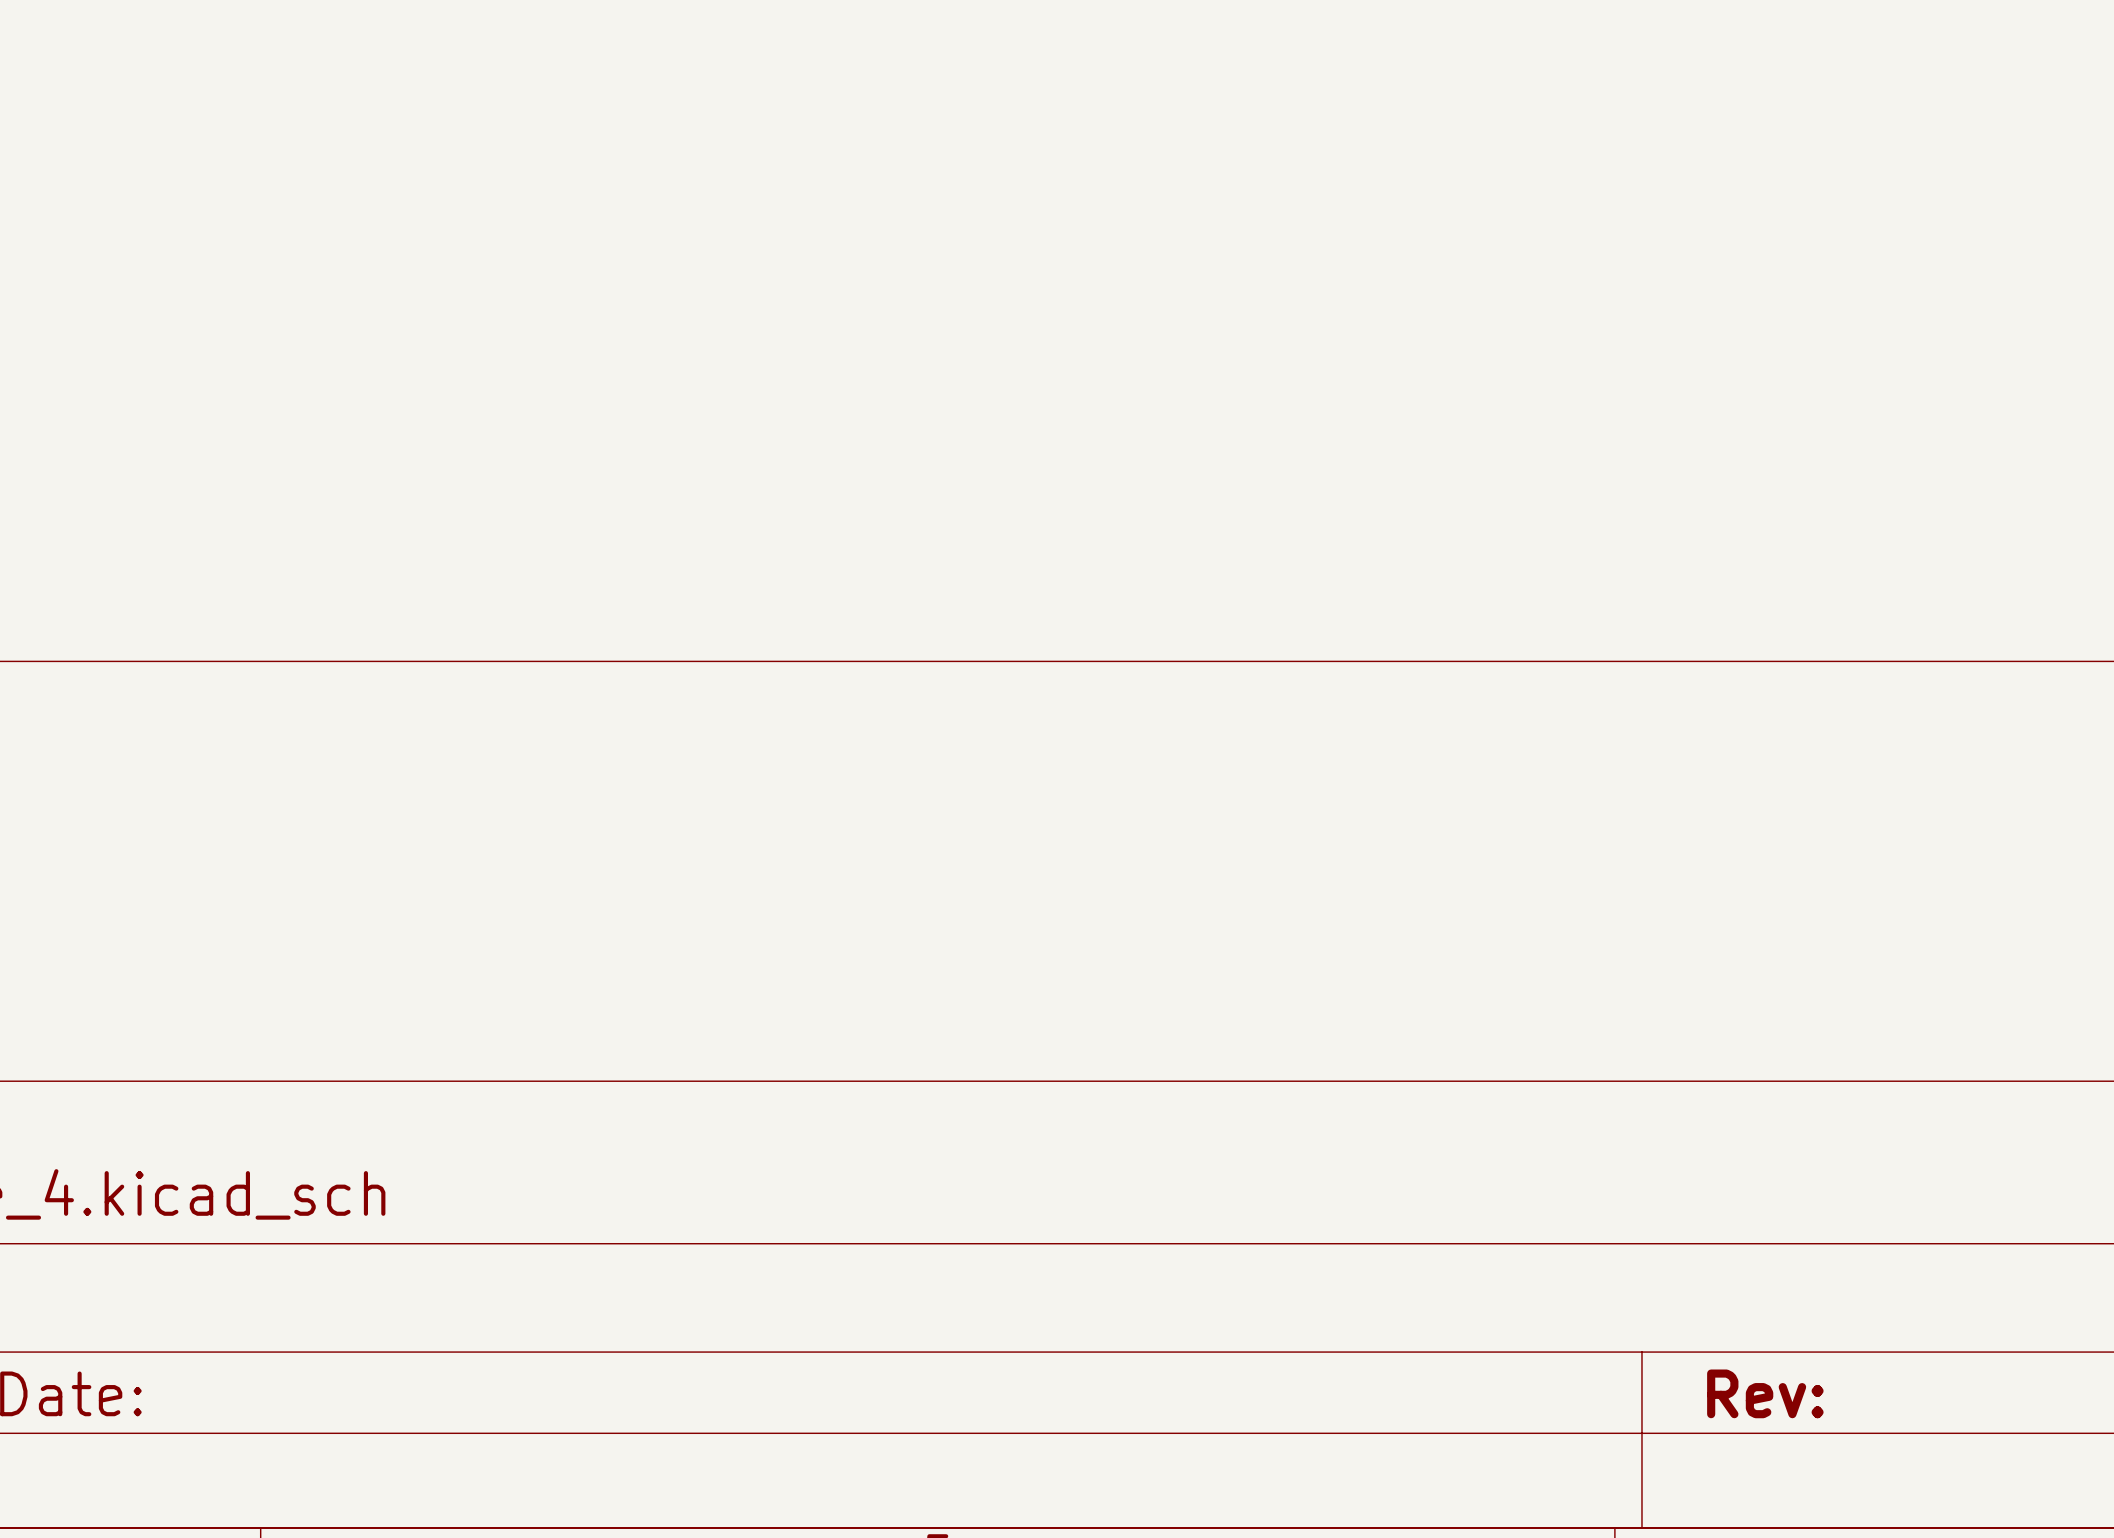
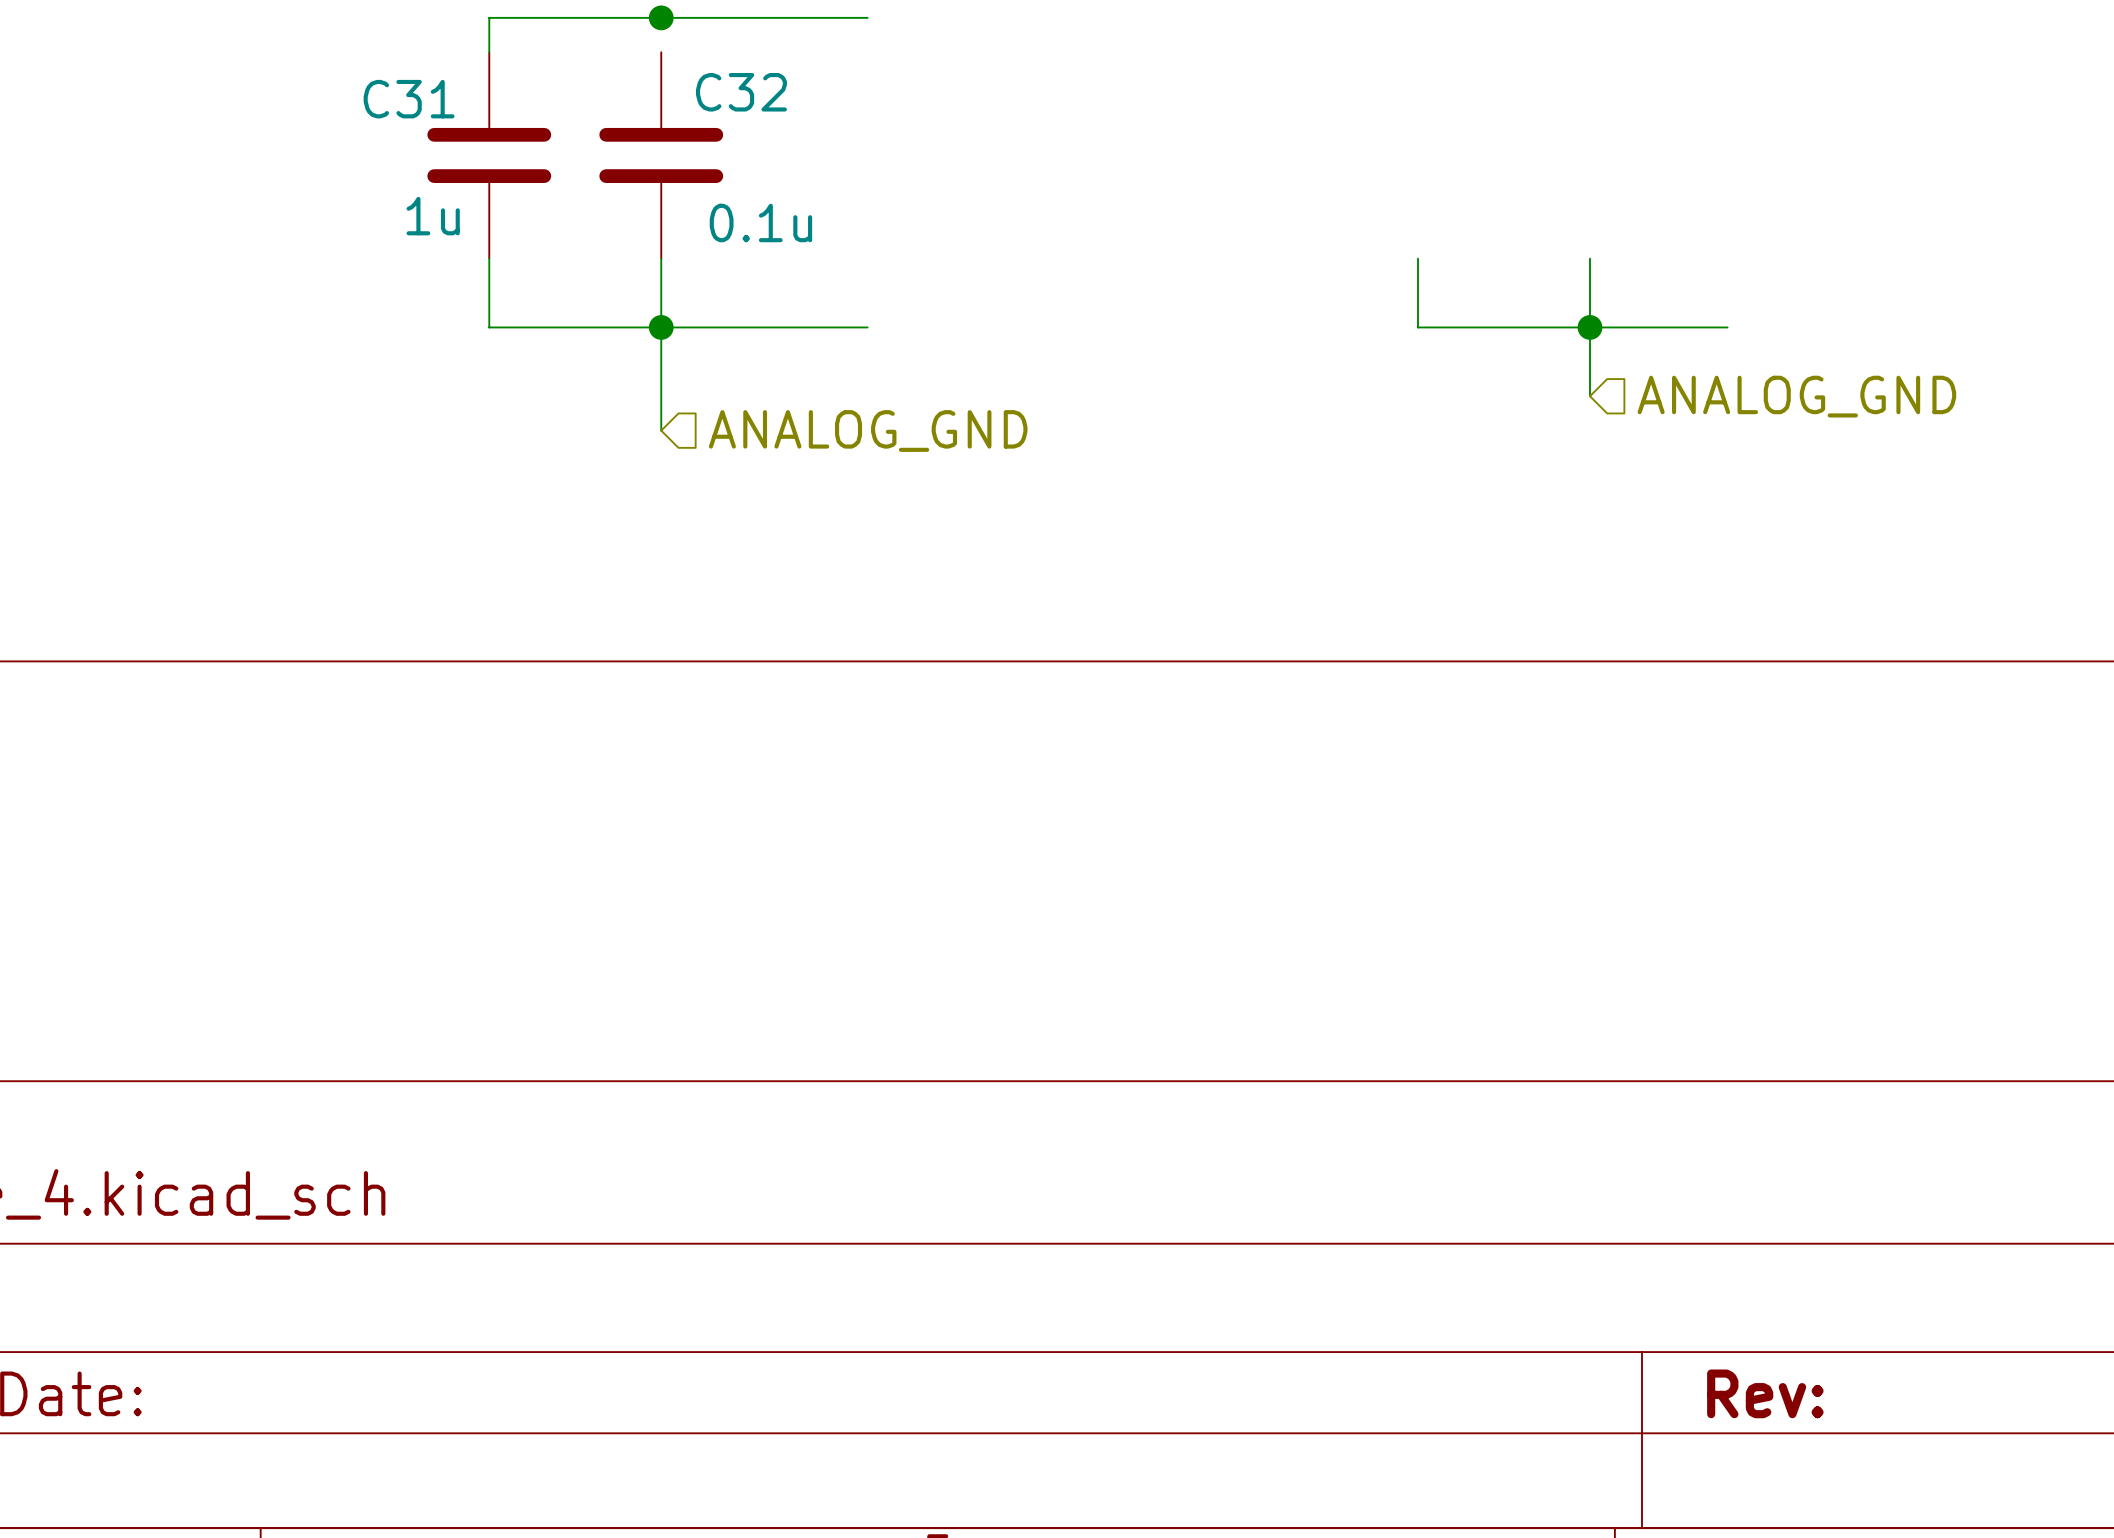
junction: none -> (661, 17)
wire: none -> (867, 17) (489, 17) (489, 52)
C31: none -> 1u (489, 155)
C32: none -> 0.1u (661, 155)
wire: none -> (489, 258) (489, 327) (867, 327)
wire: none -> (661, 258) (661, 430)
wire: none -> (1418, 258) (1418, 327) (1727, 327)
wire: none -> (1589, 258) (1589, 396)
junction: none -> (661, 327)
junction: none -> (1589, 327)
hierarchical label: none -> ANALOG_GND (1796, 396)
hierarchical label: none -> ANALOG_GND (868, 430)

